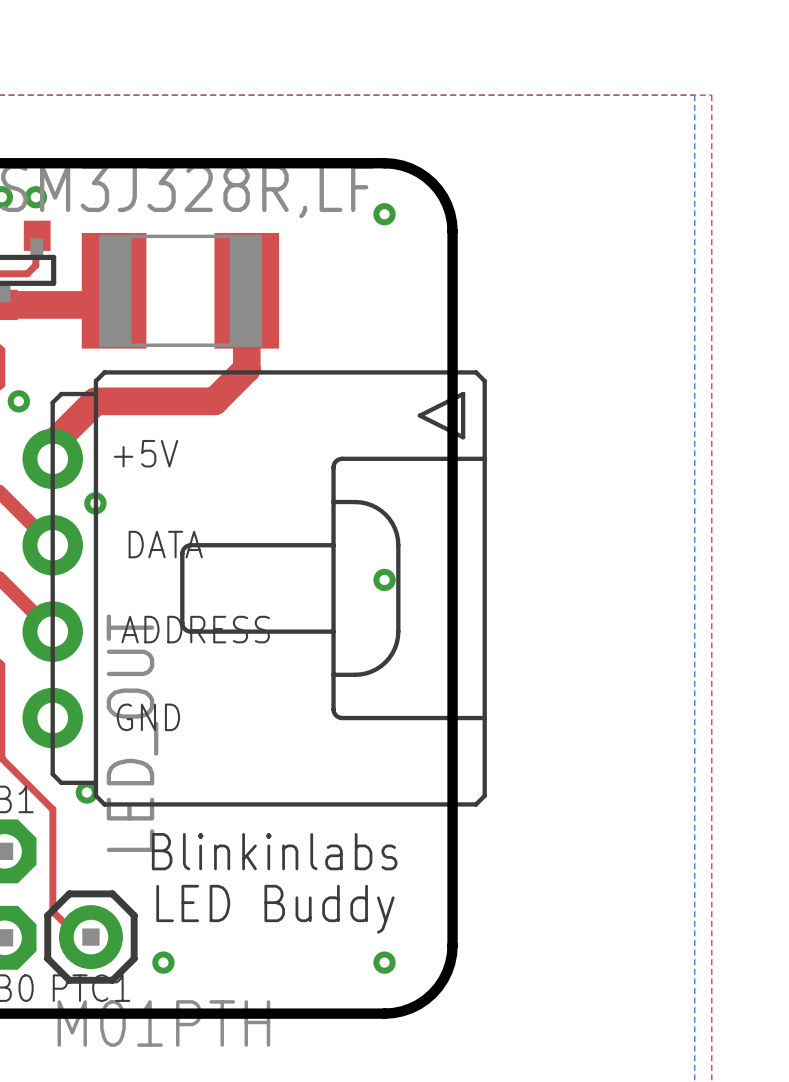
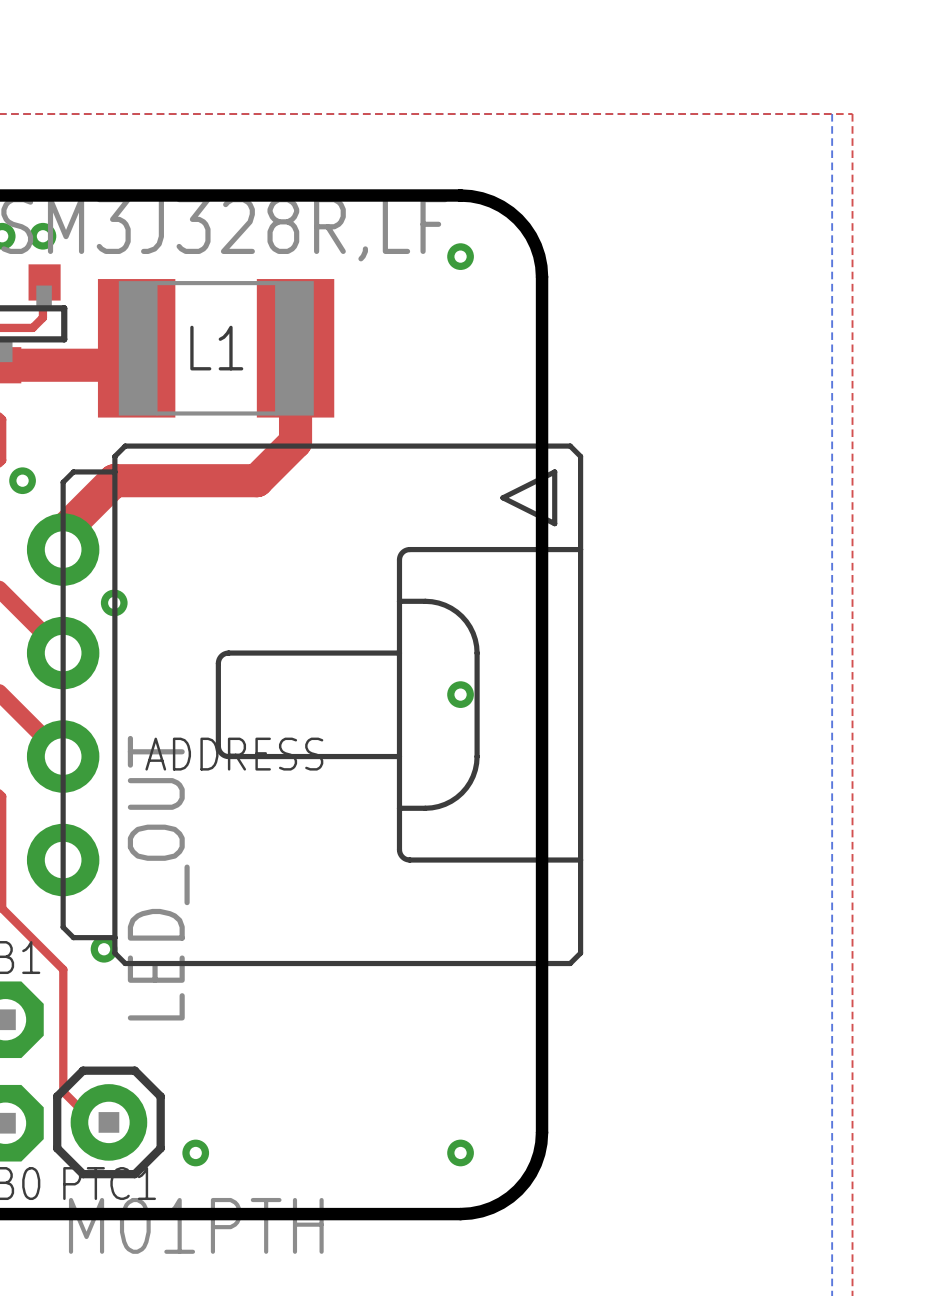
L1 name: none -> L1 (216, 348)
text: +5V (146, 453) -> none
text: DATA (165, 544) -> none
text: GND (148, 717) -> none
text: Blinkinlabs (274, 851) -> none
text: LED Buddy (275, 909) -> none

